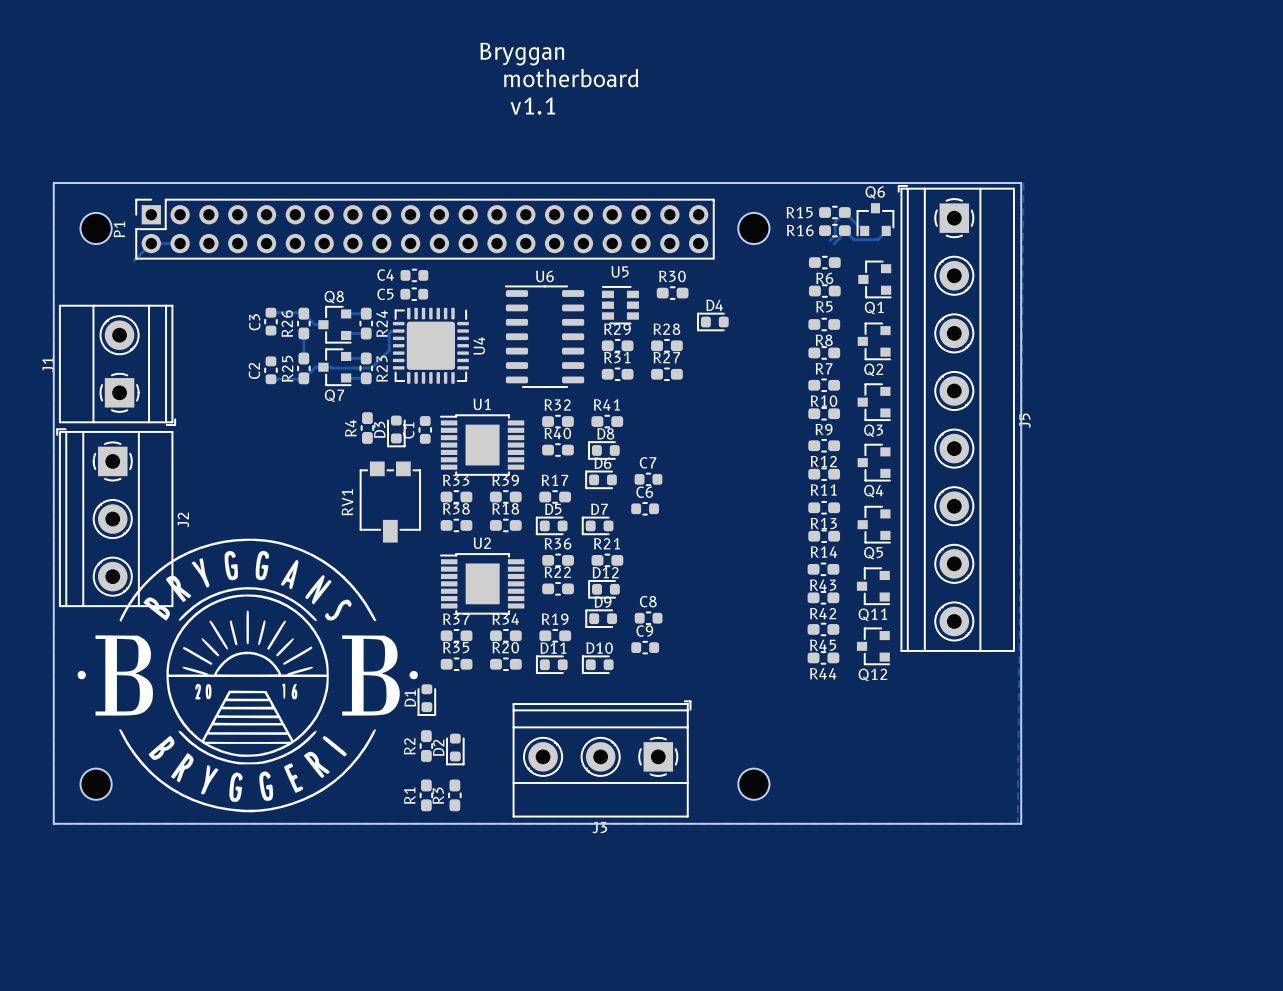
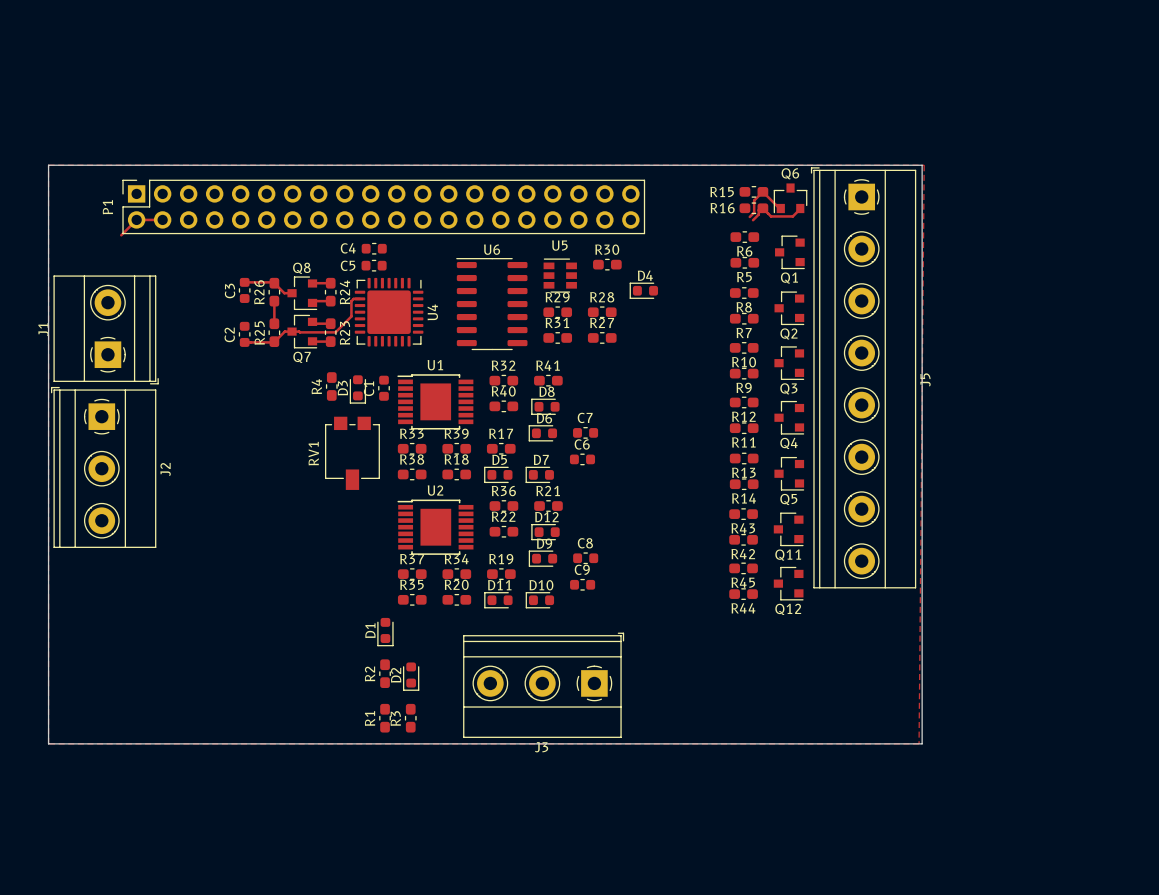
text: Bryggan (522, 54) -> none
text: motherboard (571, 78) -> none
text: v1.1 (532, 106) -> none
part: (96, 228) -> none
part: (753, 228) -> none
drawing: [77, 538, 418, 813] -> none
part: (96, 784) -> none
part: (753, 784) -> none

